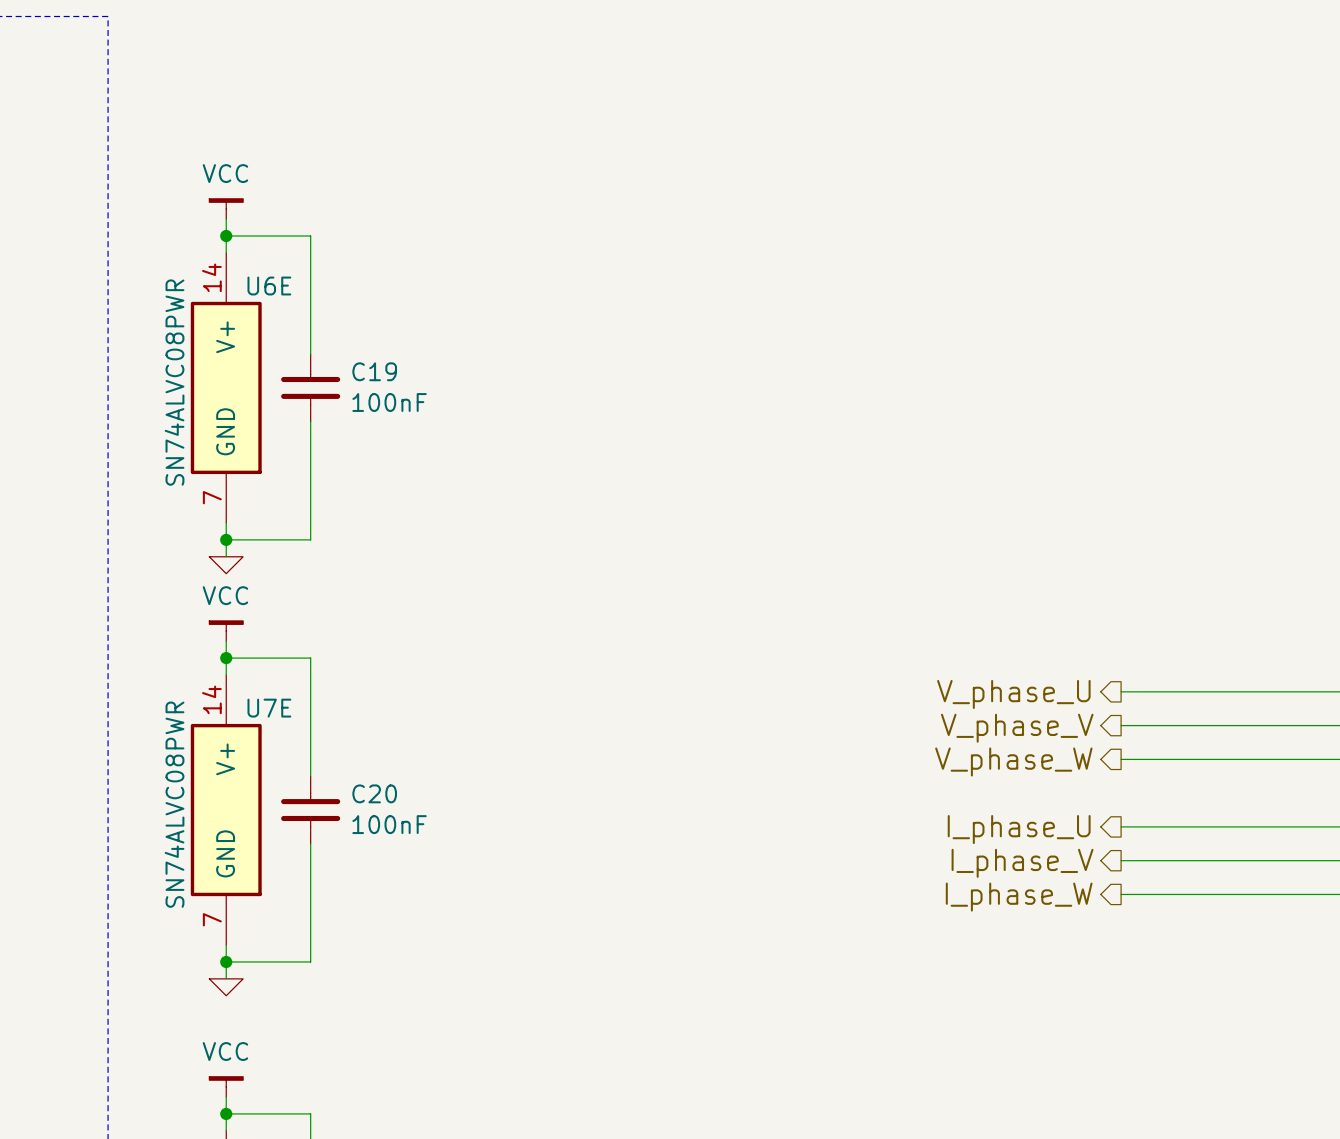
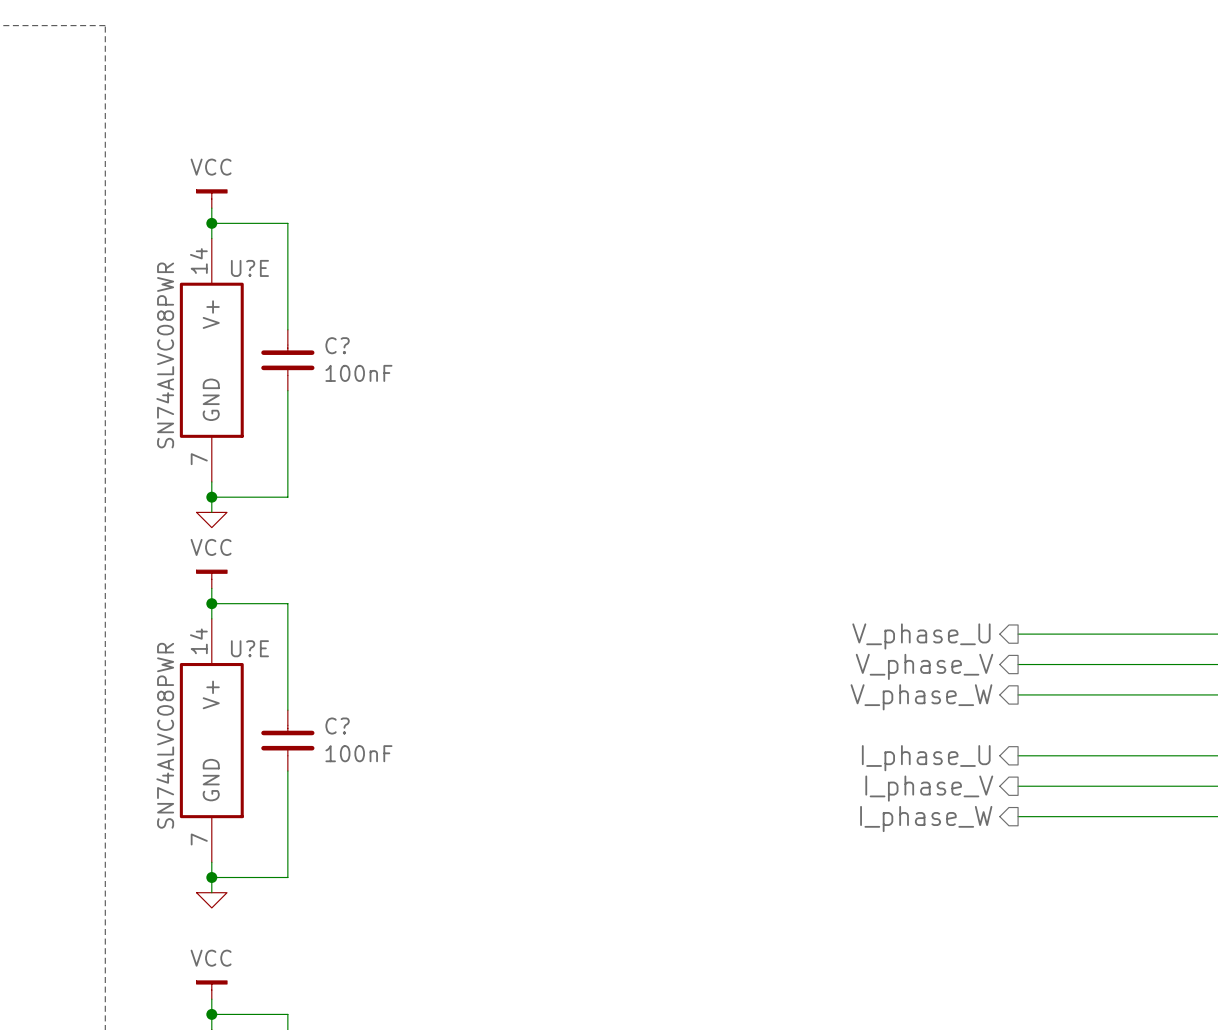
U6E name: U6E (269, 286) -> U?E (249, 268)
C19 name: C19 (374, 371) -> C? (337, 345)
U7E name: U7E (269, 708) -> U?E (249, 648)
C20 name: C20 (374, 793) -> C? (337, 726)

